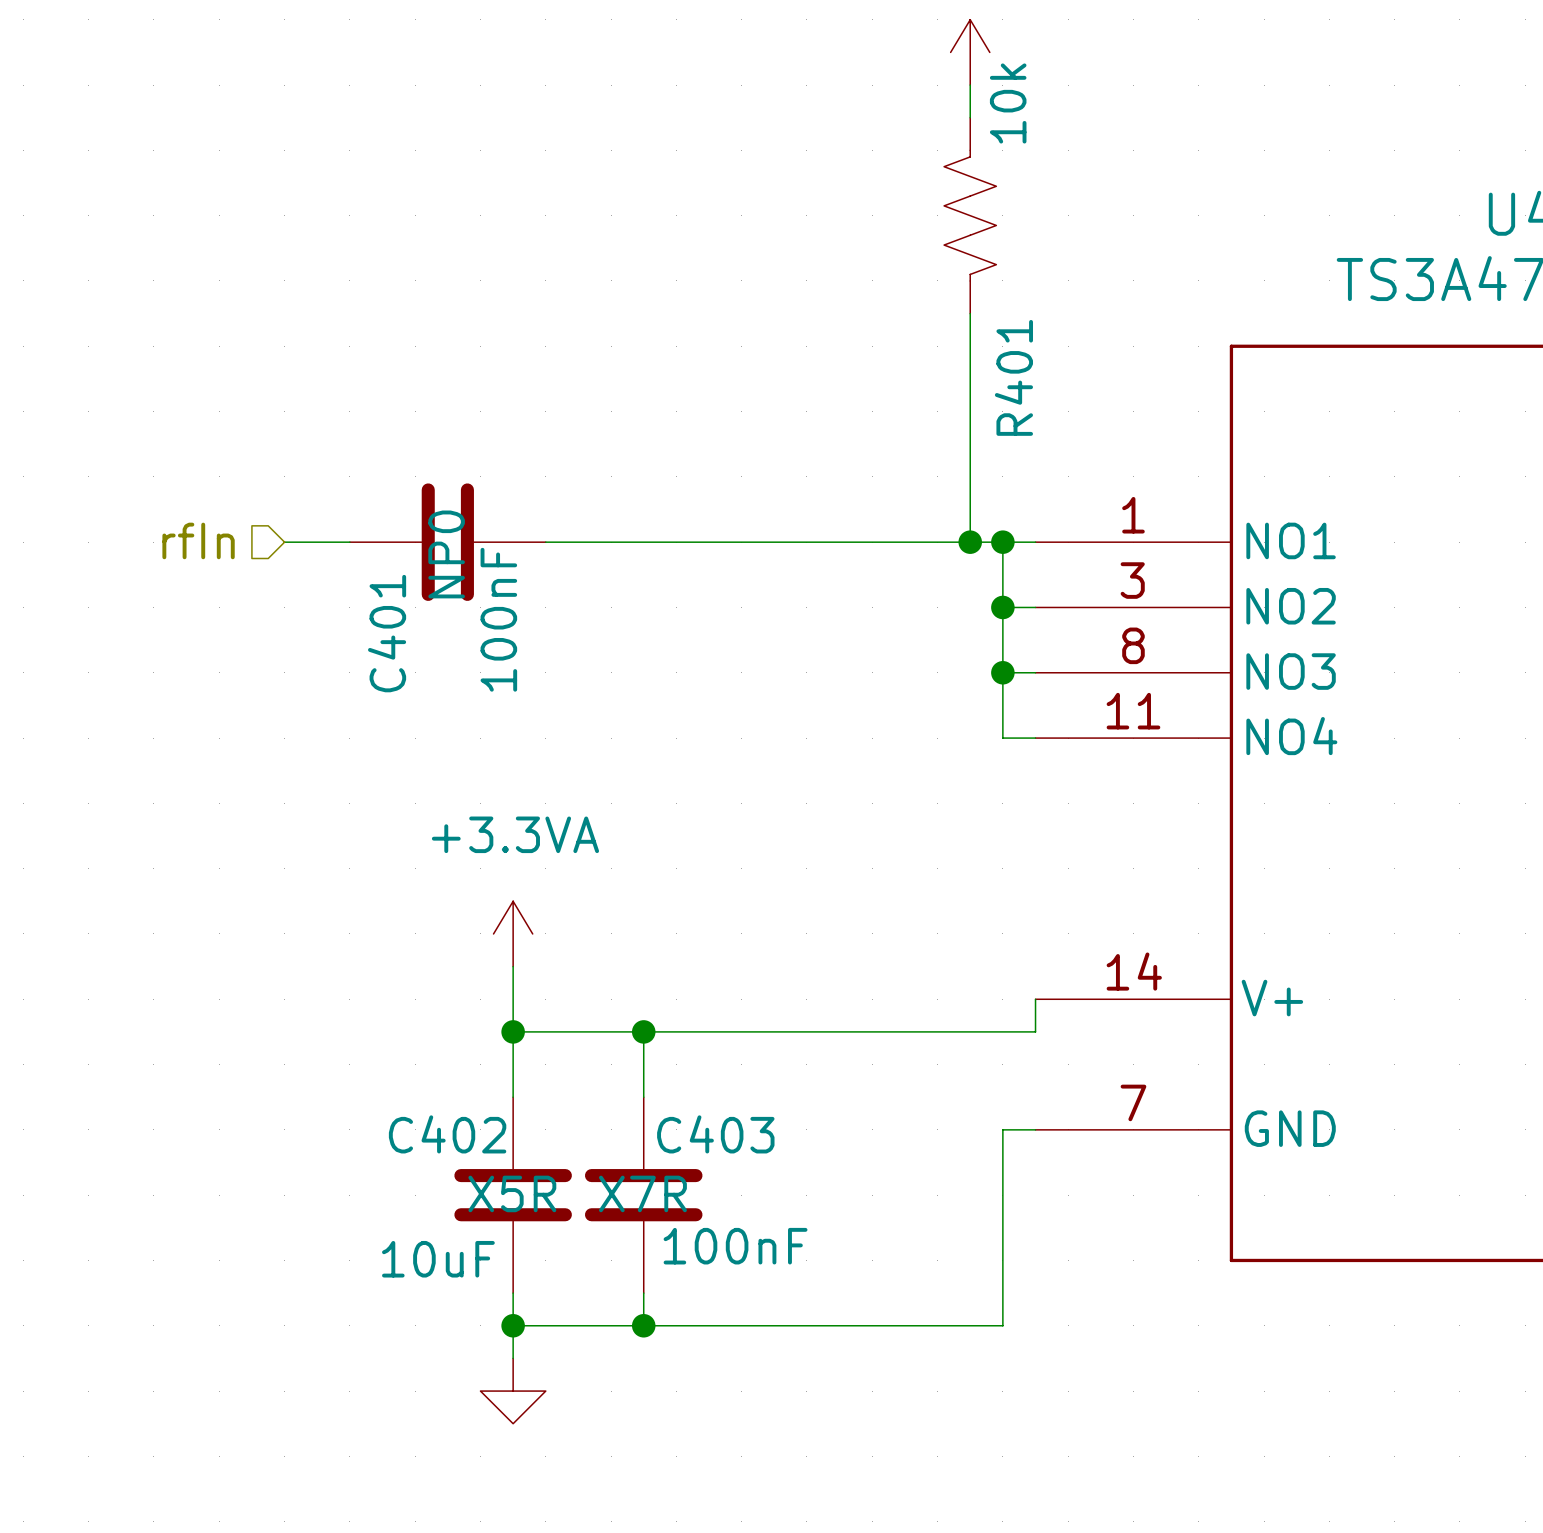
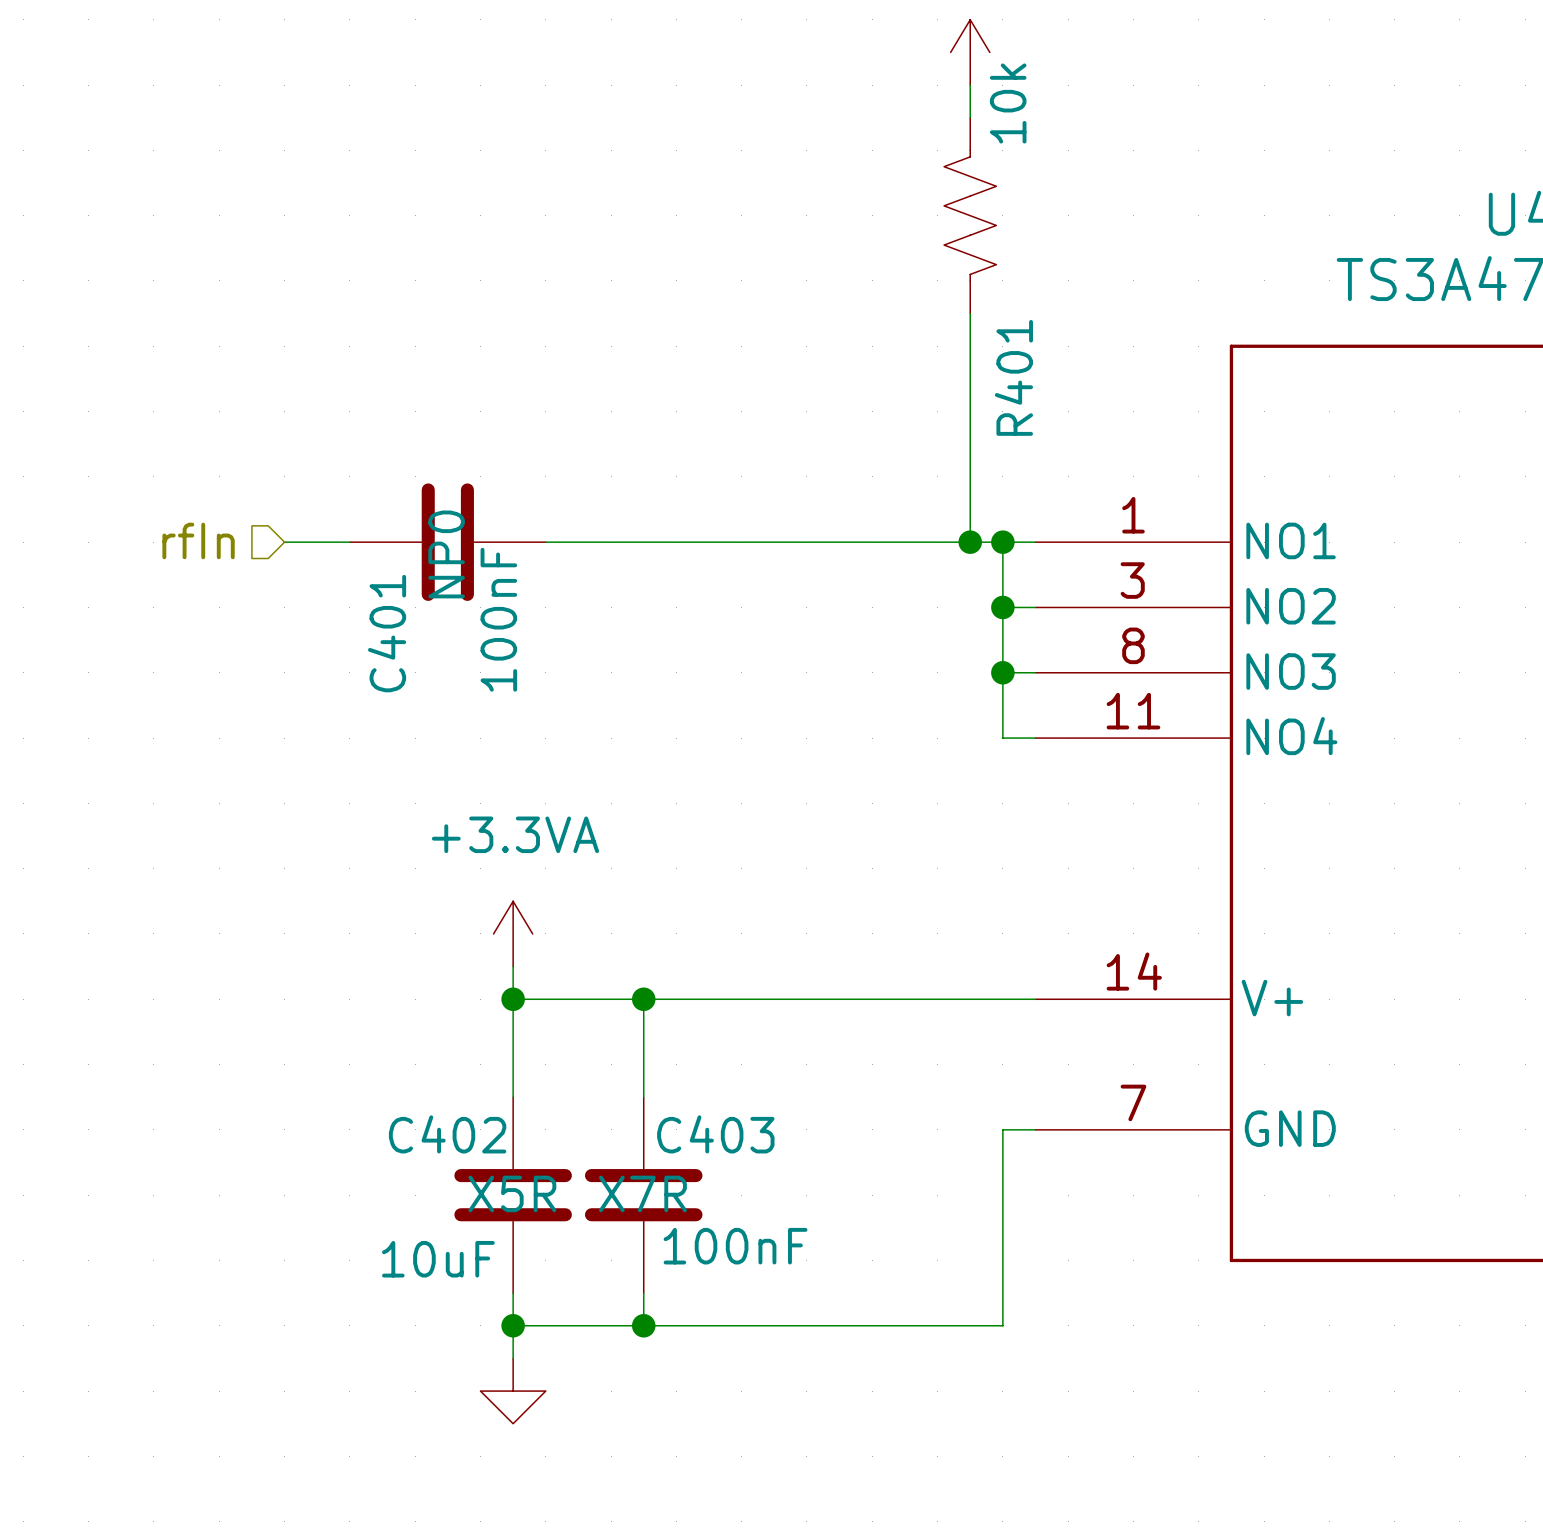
wire: none -> (643, 999) (643, 1031)
wire: (1035, 999) (1035, 1031) (513, 1031) -> (1035, 999) (513, 999)
junction position: (513, 1031) -> (513, 999)
junction position: (643, 1031) -> (643, 999)

